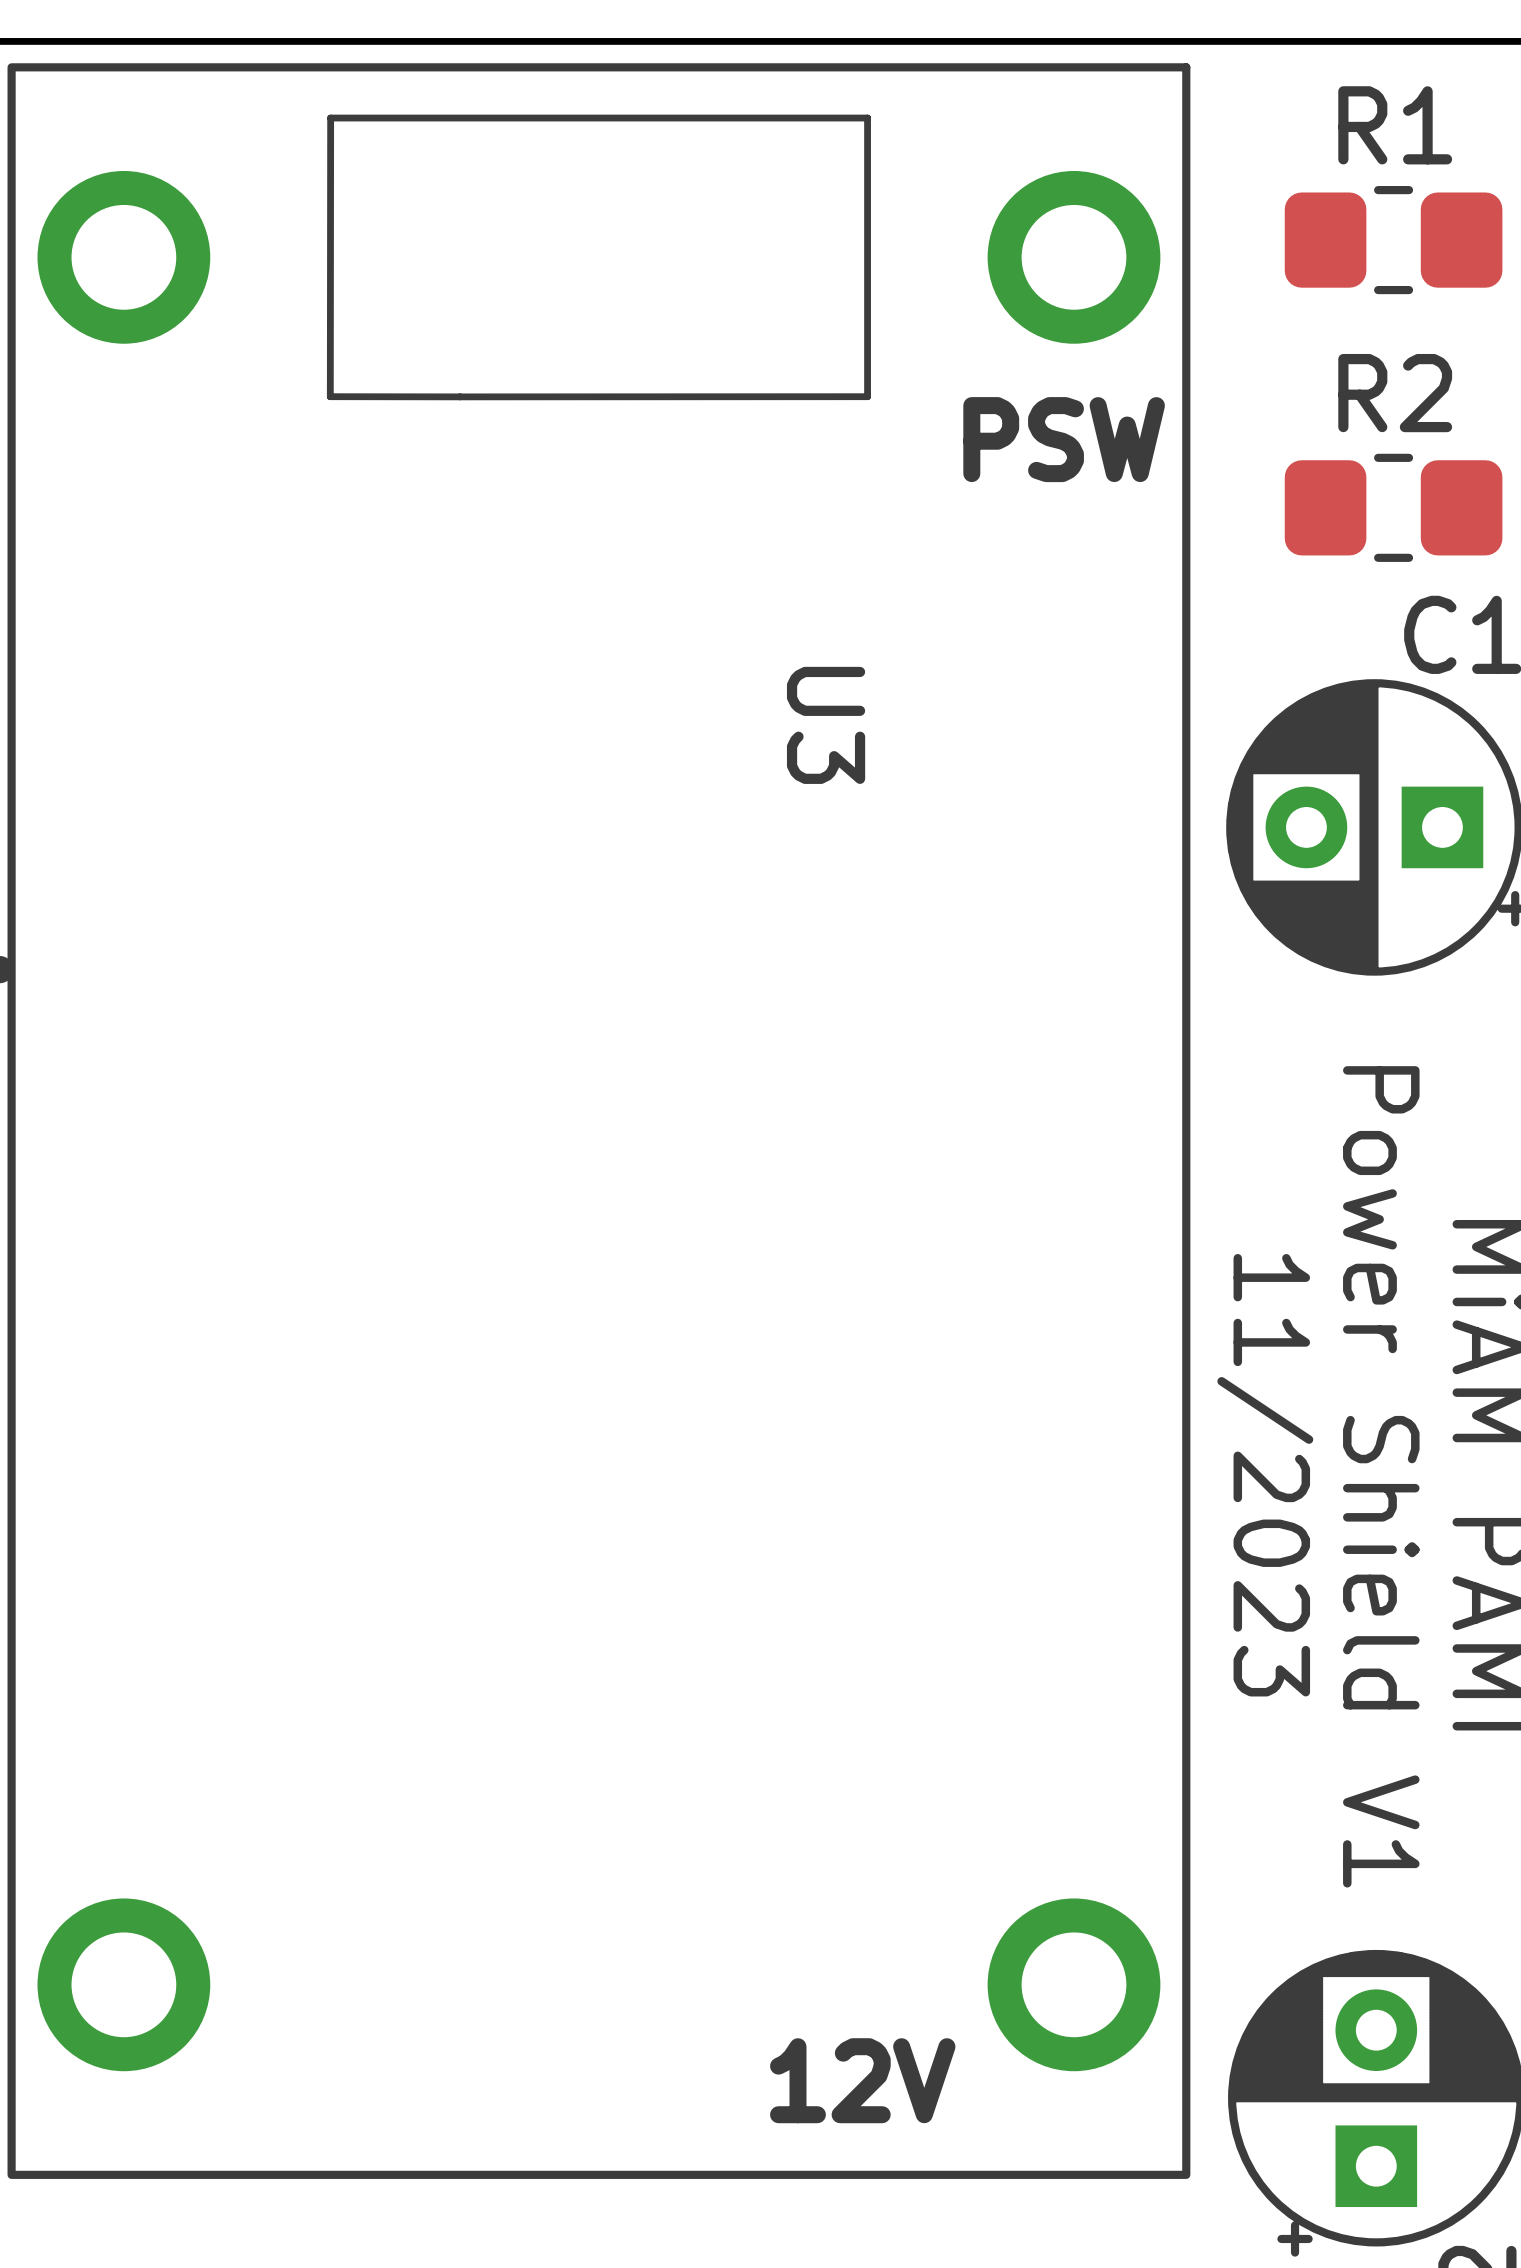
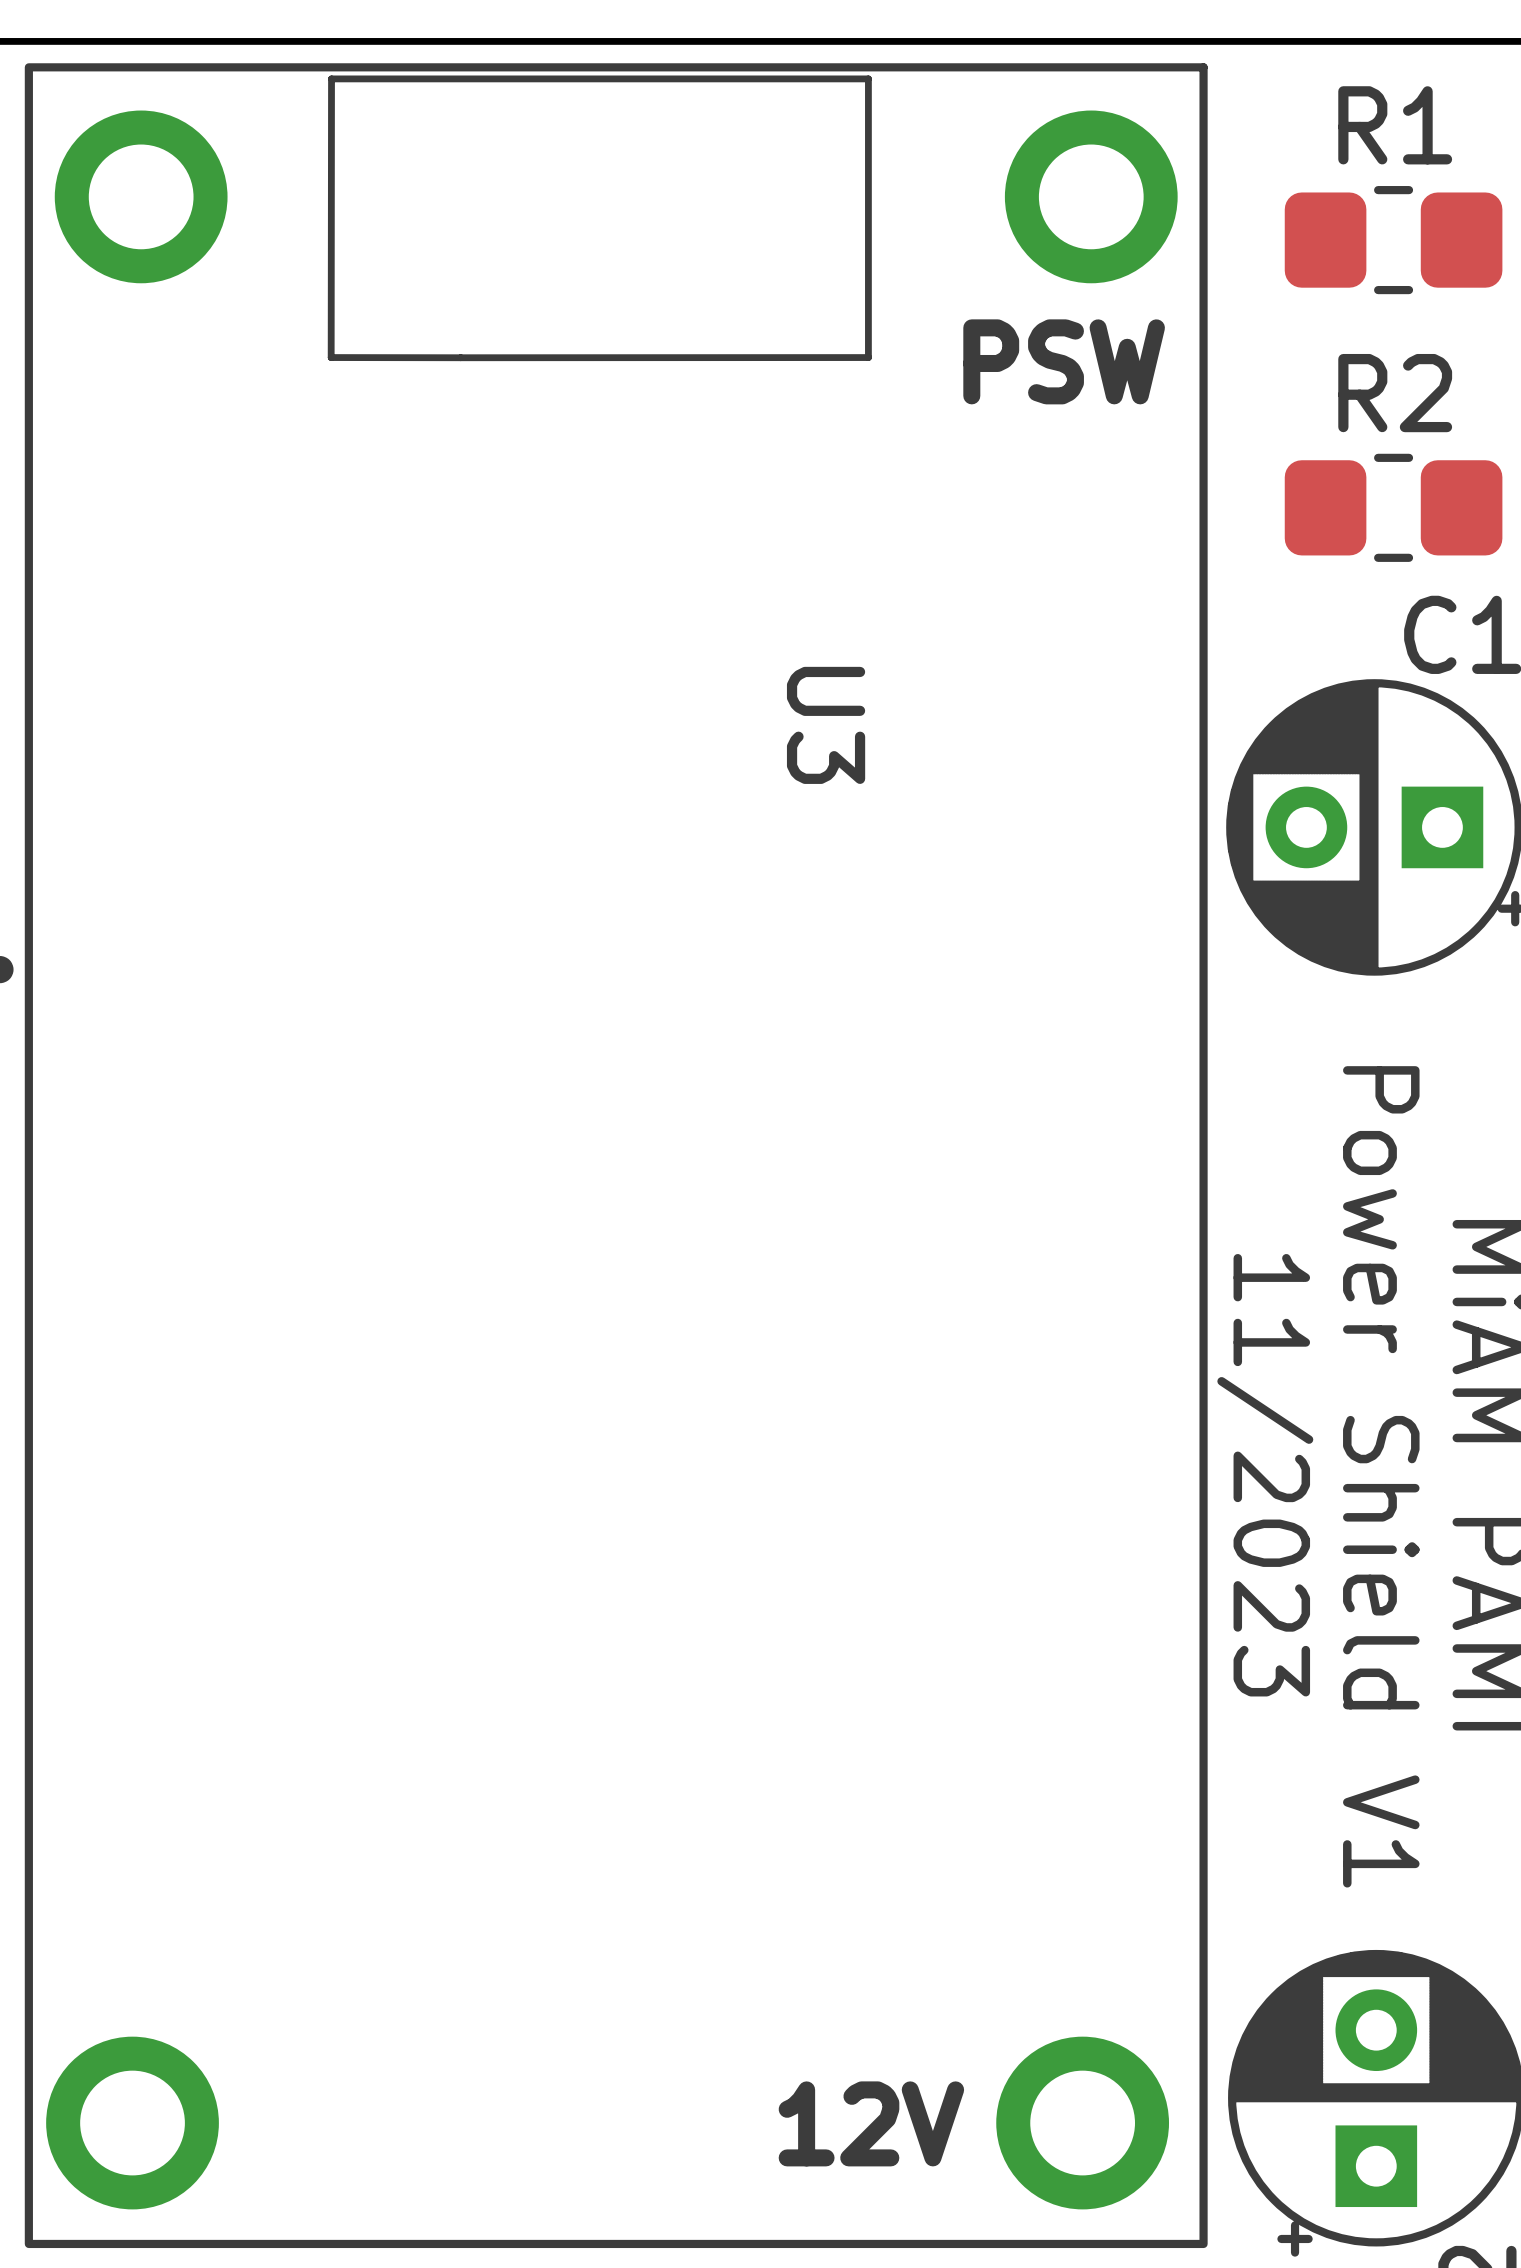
U3 footprint: [7, 63, 1191, 2179] -> [24, 63, 1208, 2249]
text position: PSW (1064, 439) -> PSW (1064, 361)
text position: 12V (862, 2080) -> 12V (871, 2123)

